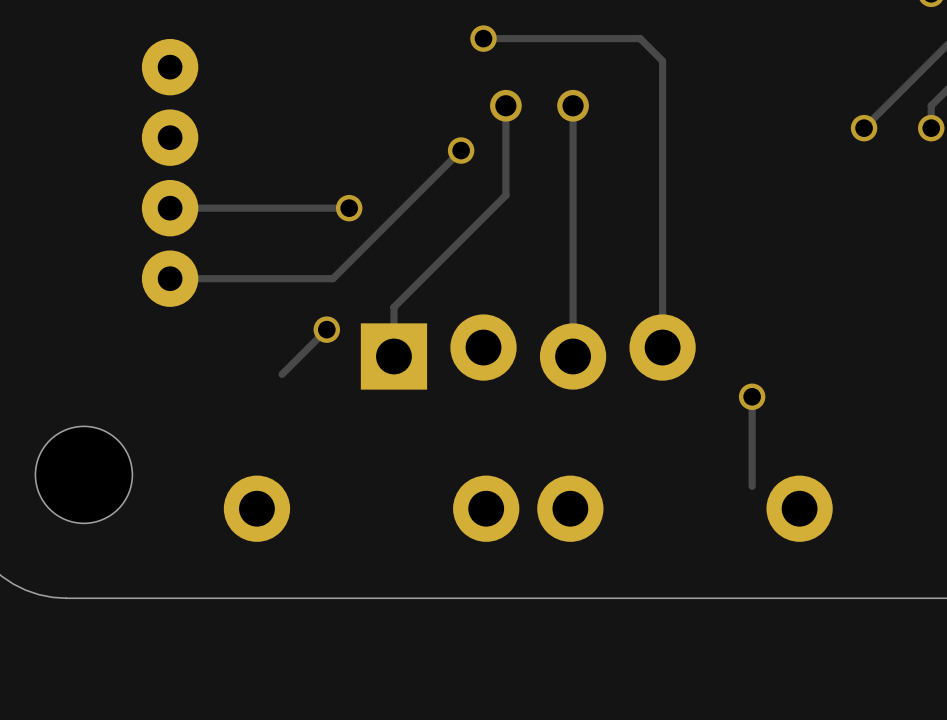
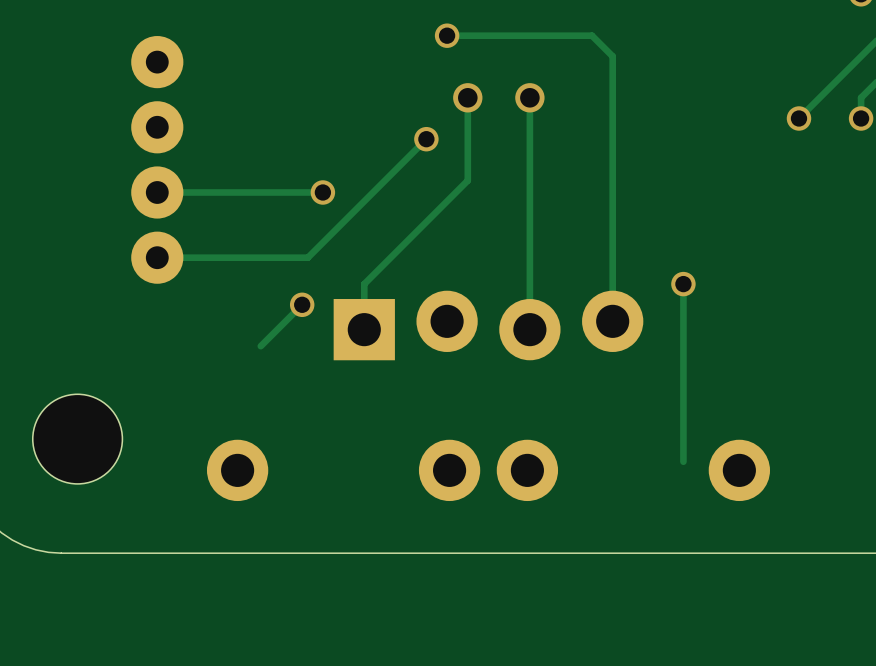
track: none -> (683, 284) (683, 461)
track: (752, 396) (752, 486) -> none
via position: (752, 396) -> (683, 284)

